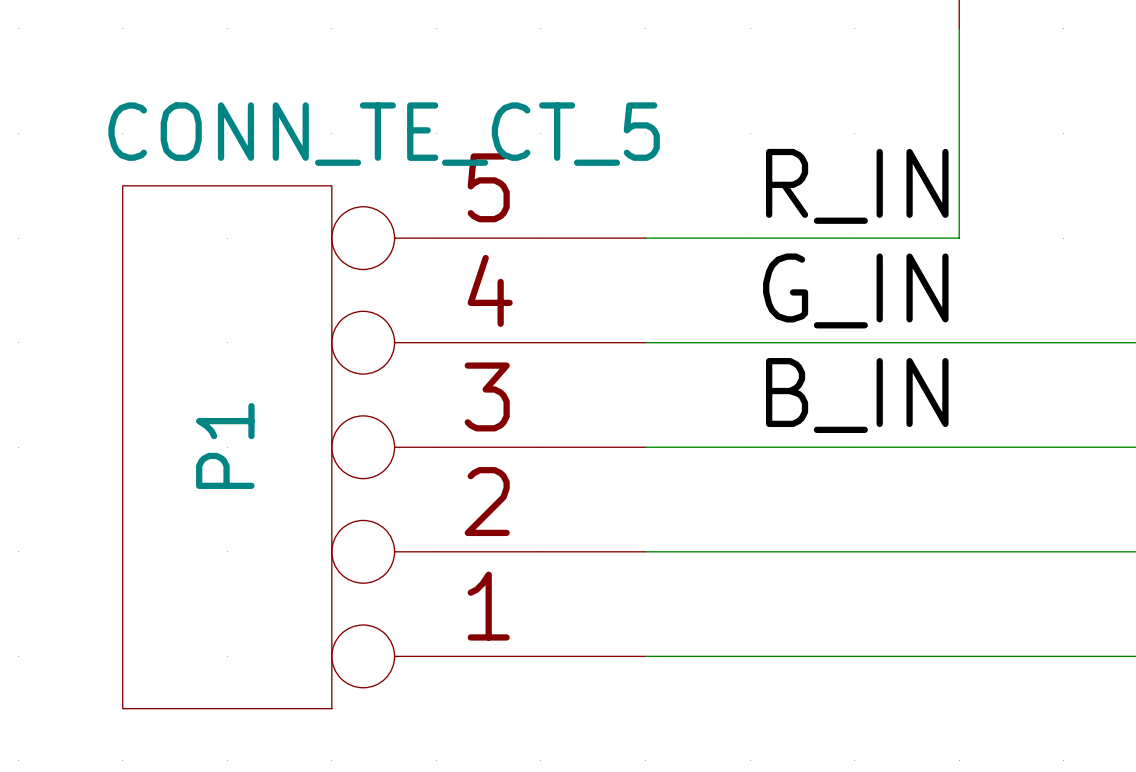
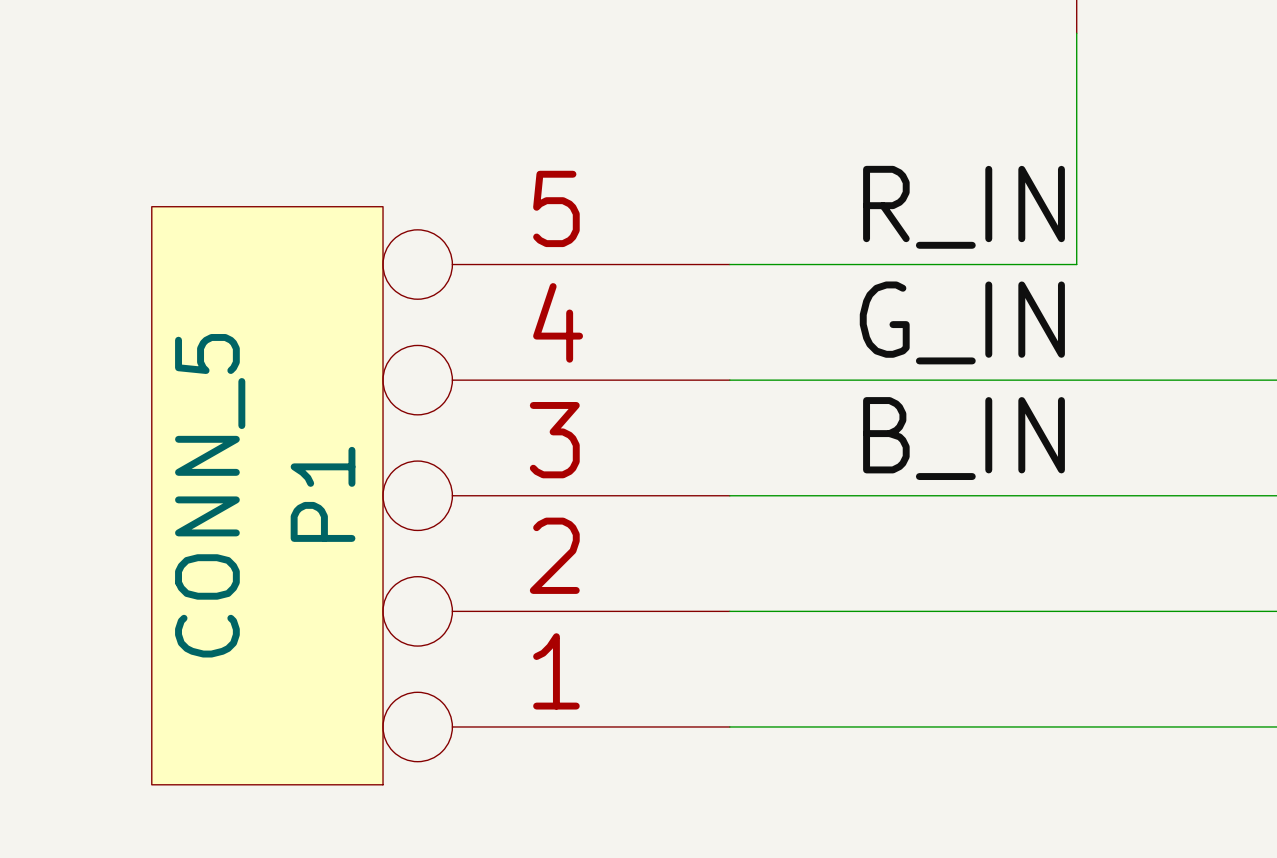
P1 value: CONN_TE_CT_5 (384, 134) -> CONN_5 (210, 495)
P1 symbol: [122, 185, 646, 709] -> [151, 206, 730, 785]

